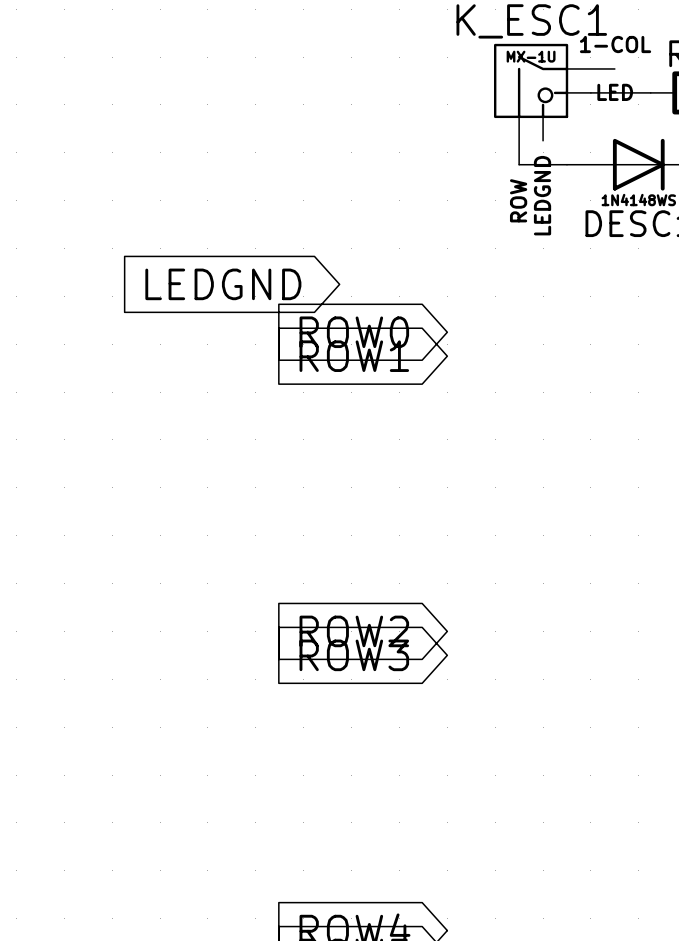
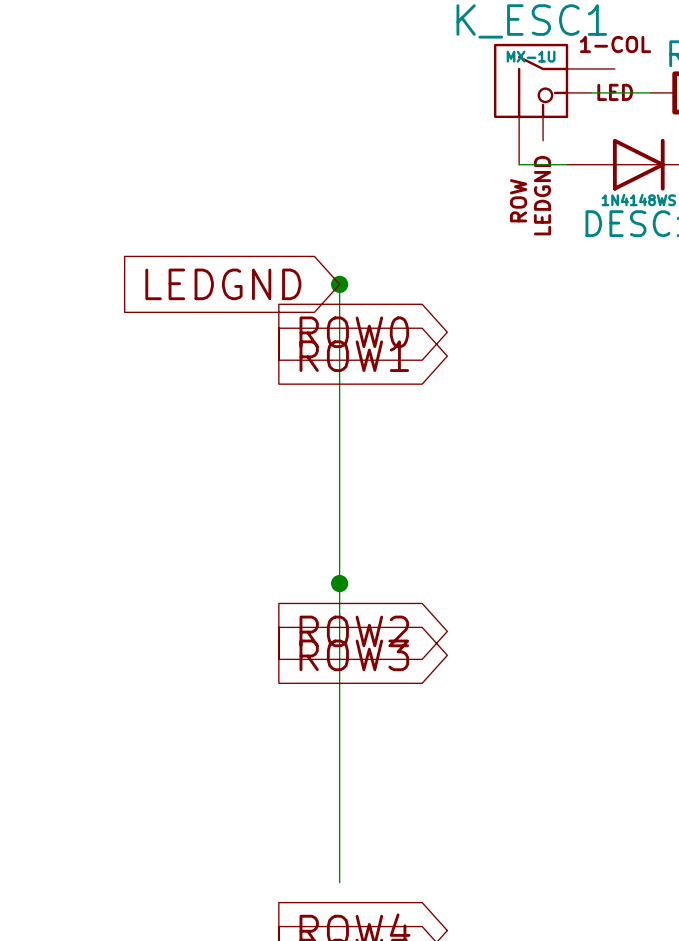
wire: none -> (339, 284) (339, 882)
junction: none -> (339, 284)
junction: none -> (339, 583)

